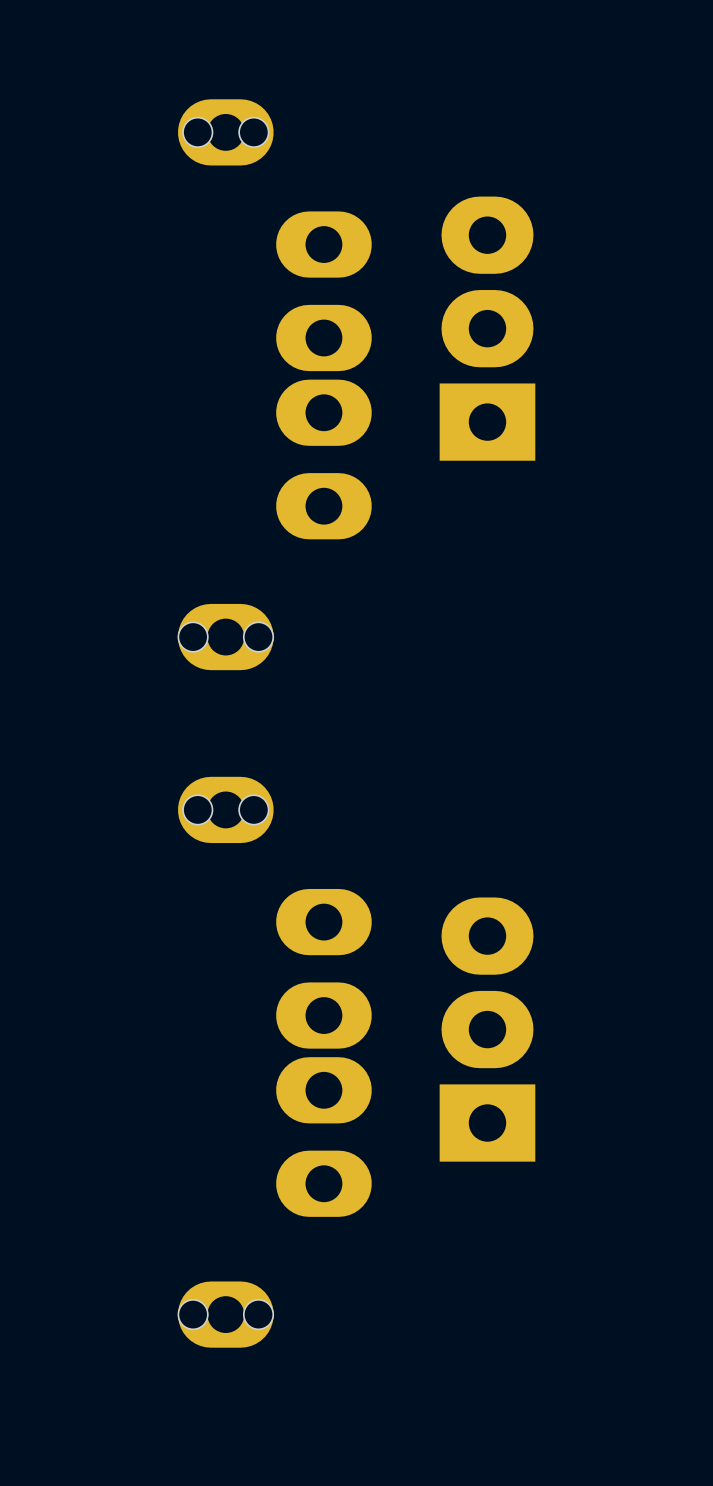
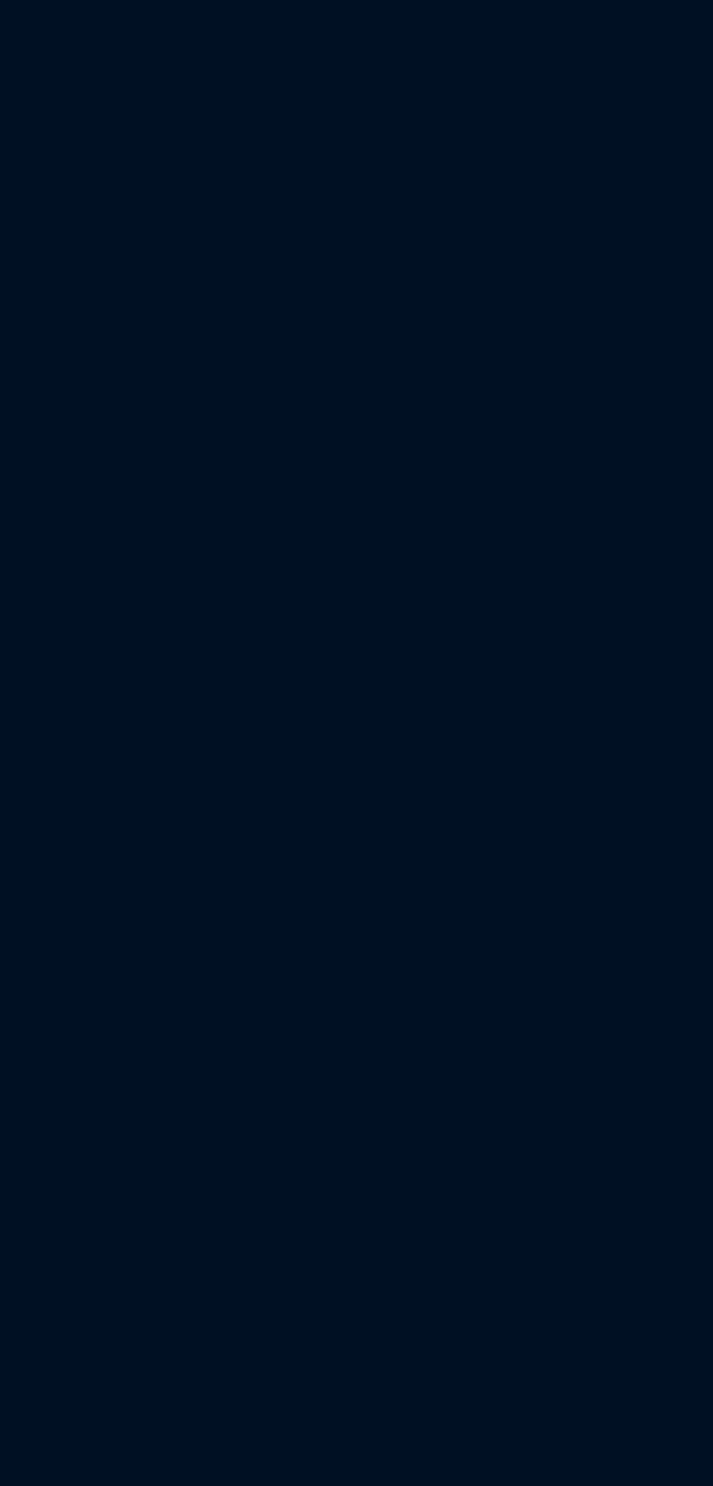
part: (487, 328) -> none
part: (274, 384) -> none
part: (487, 1029) -> none
part: (274, 1062) -> none

